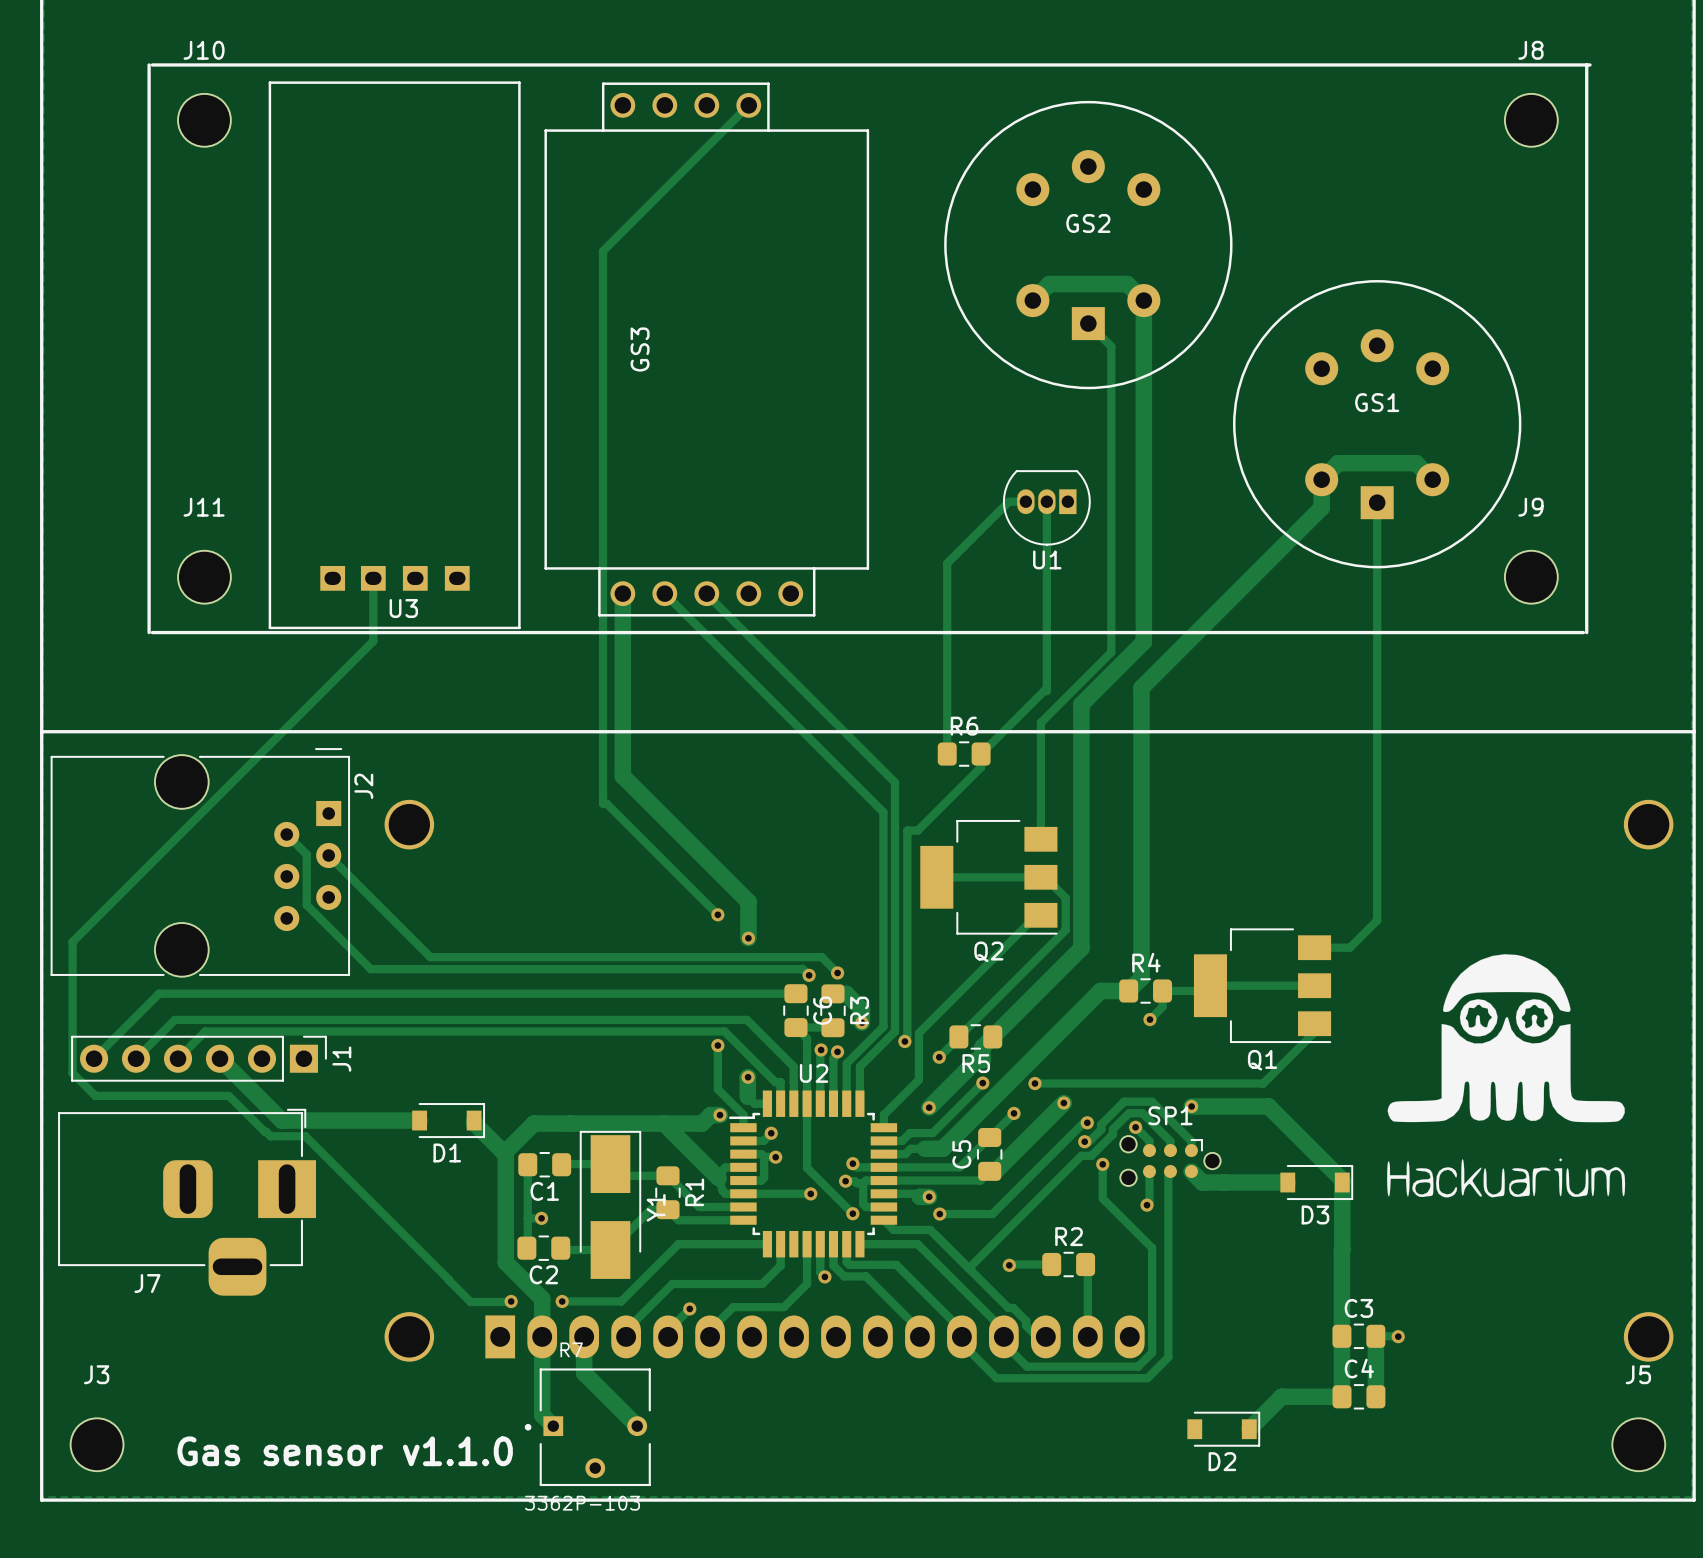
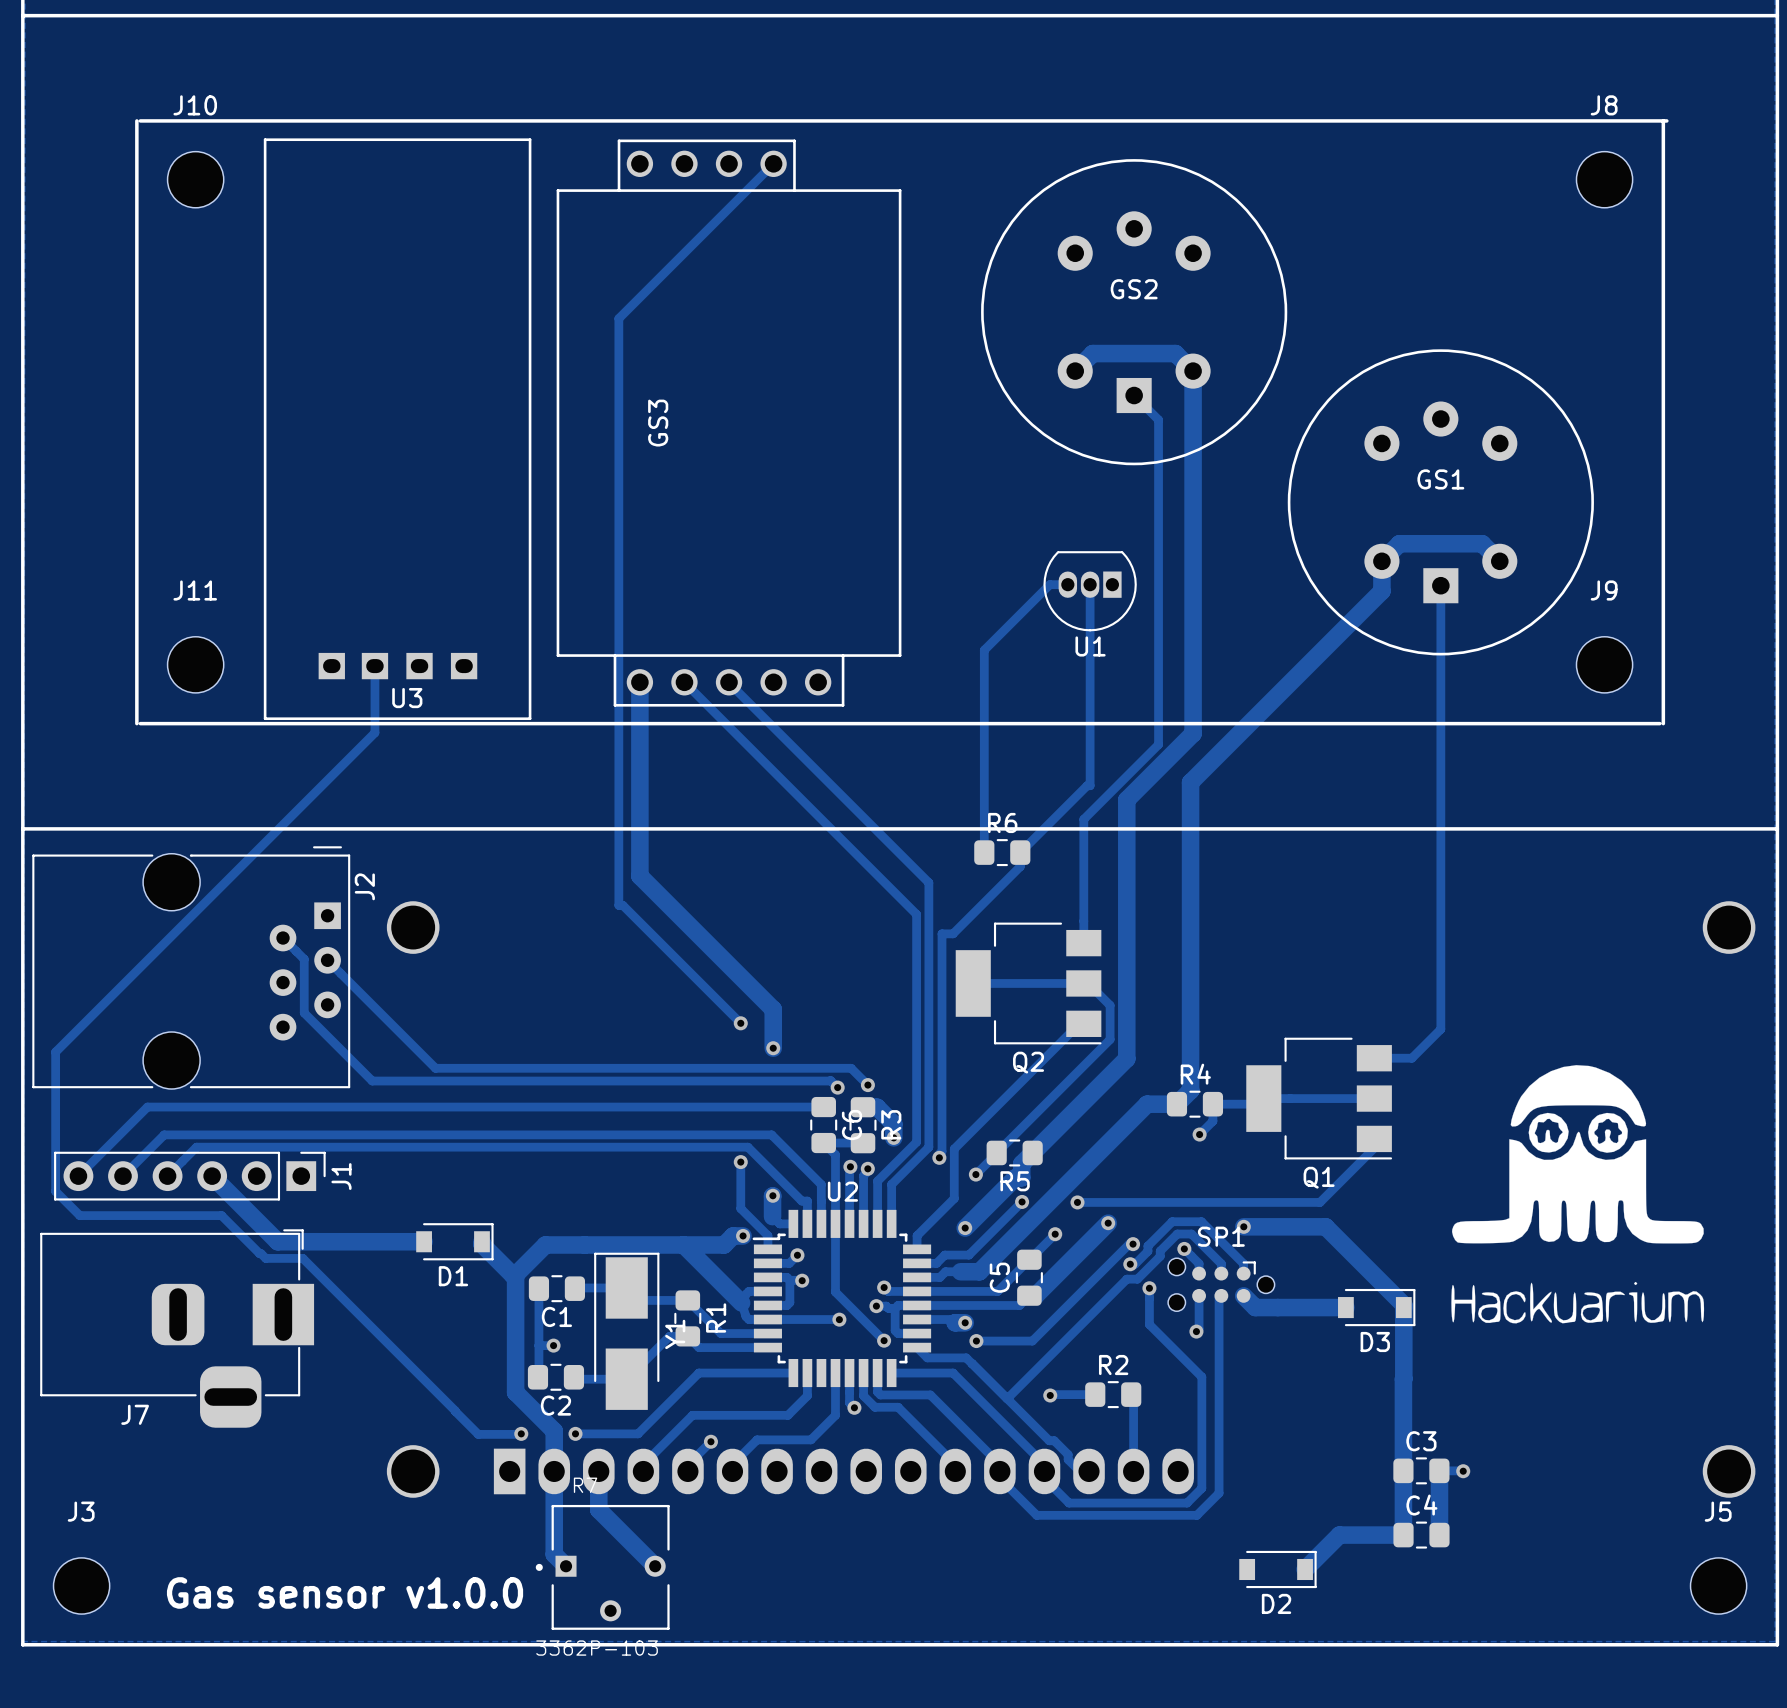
text: Gas sensor v1.1.0 (345, 1451) -> Gas sensor v1.0.0 (345, 1592)

